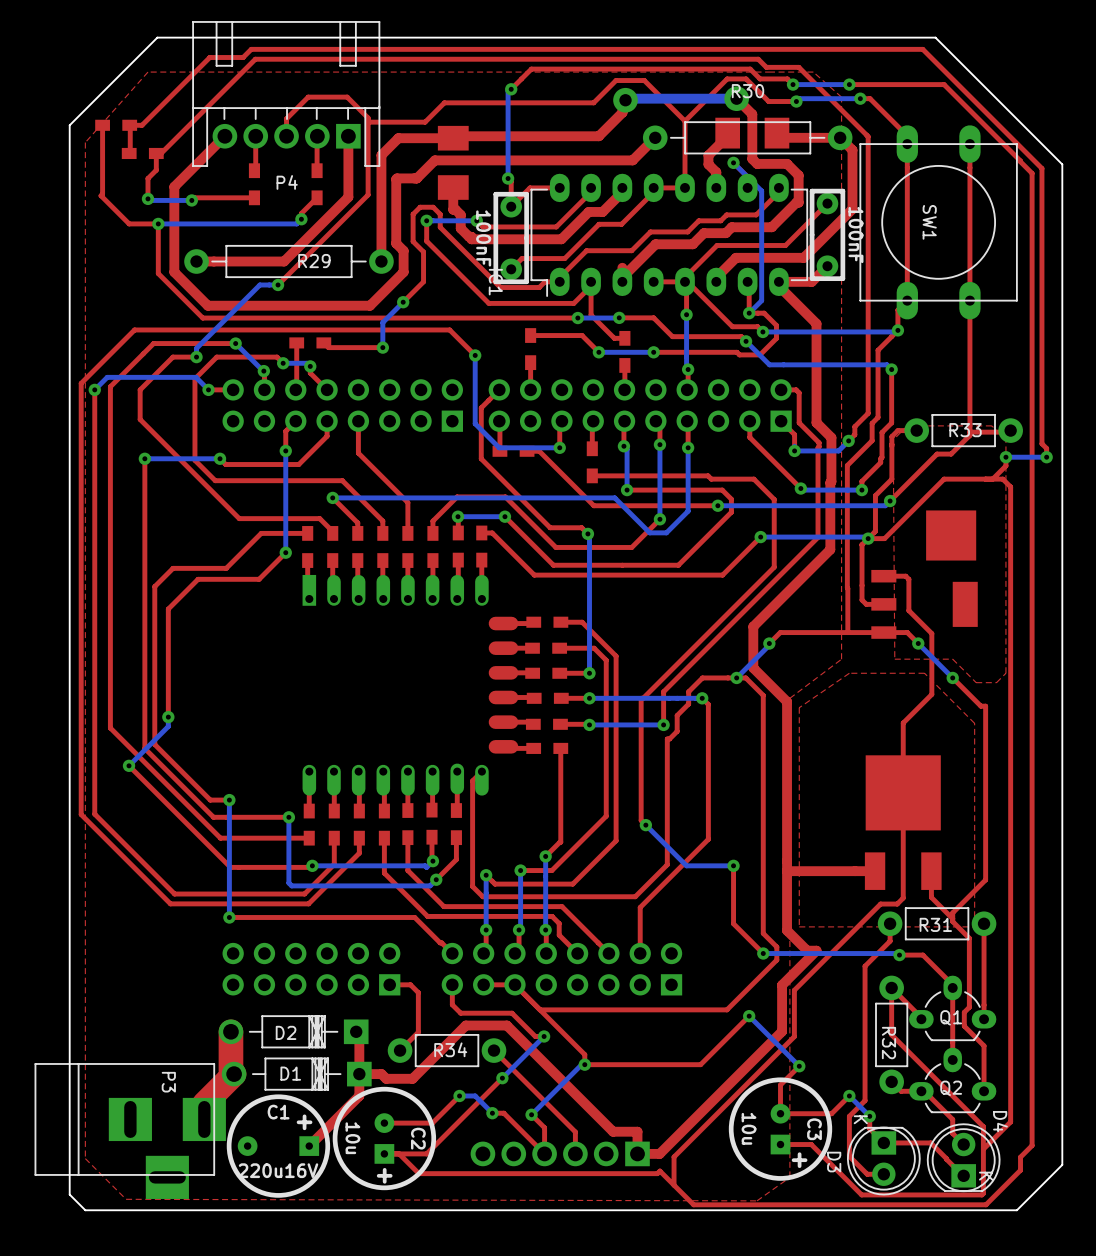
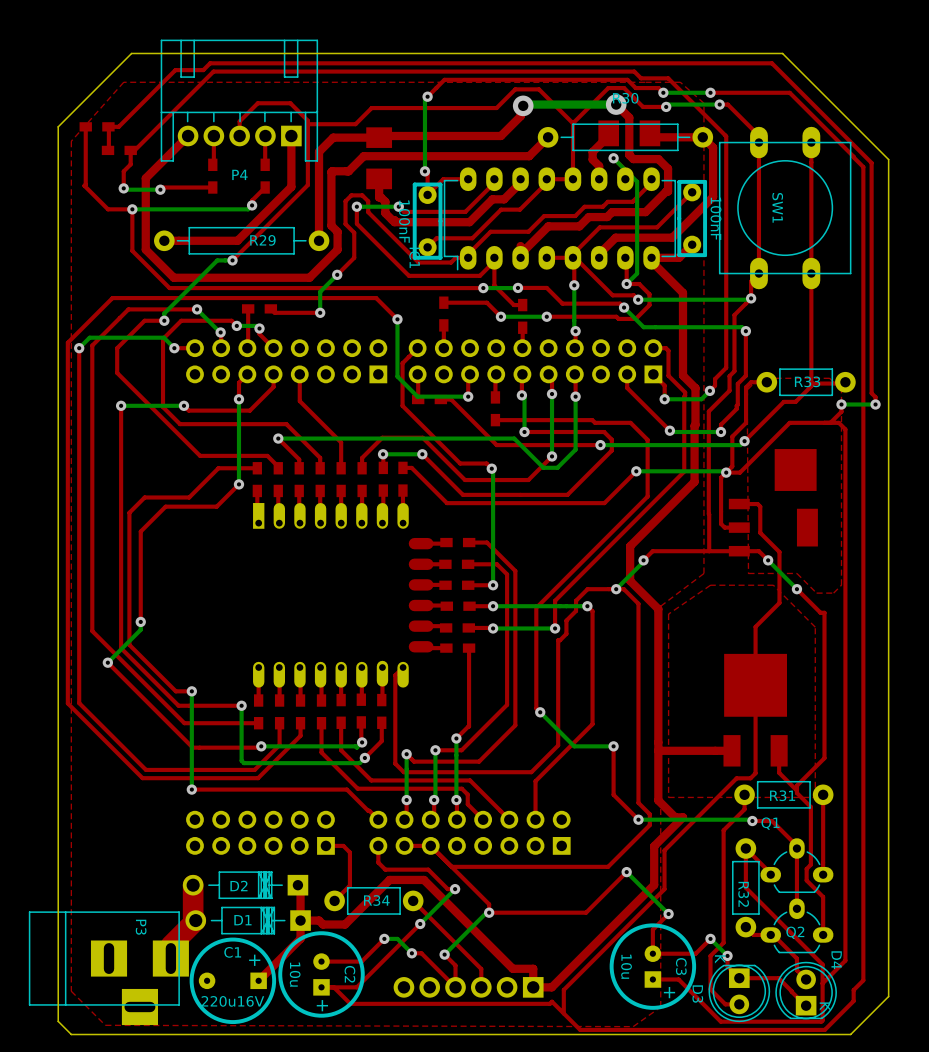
Q1 name position: Q1 (951, 1017) -> Q1 (770, 823)

